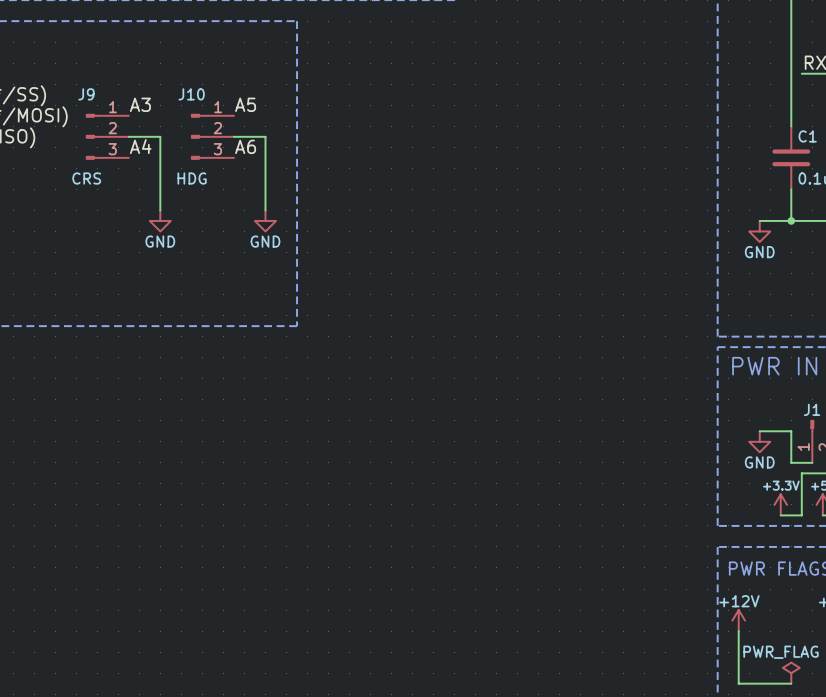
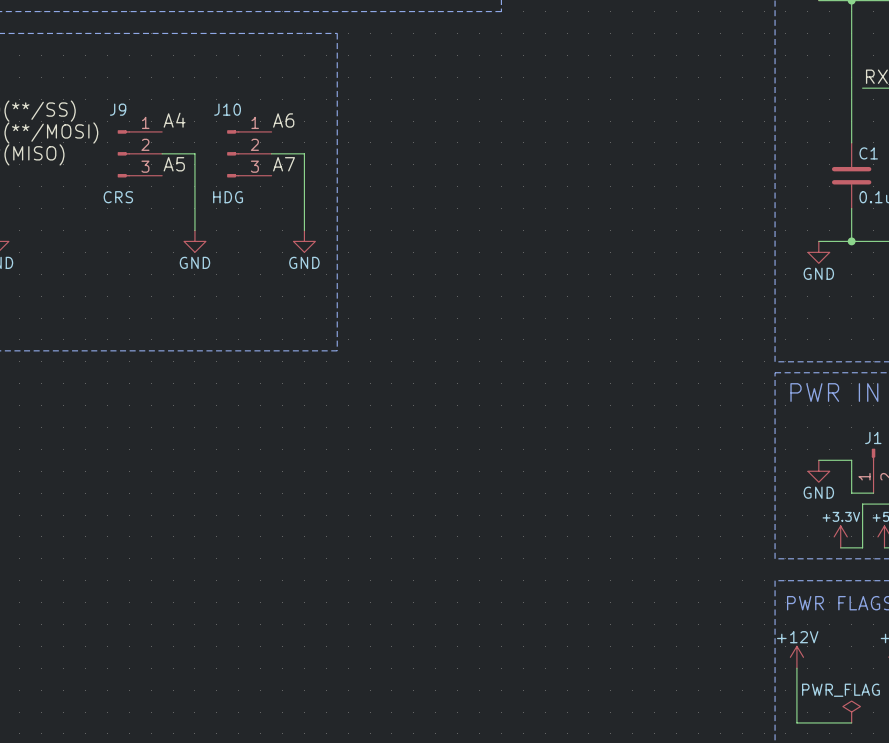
label: A3 (140, 104) -> A4 (174, 120)
label: A5 (245, 104) -> A6 (283, 120)
label: A4 (140, 146) -> A5 (174, 164)
label: A6 (245, 146) -> A7 (284, 164)

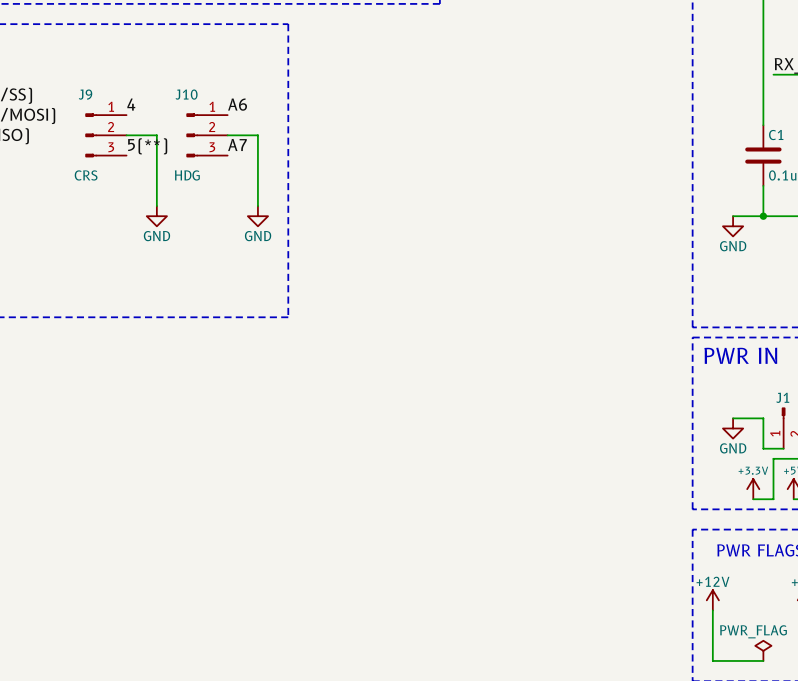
label: A4 (174, 120) -> 4 (131, 104)
label: A5 (174, 164) -> 5(**) (147, 146)

